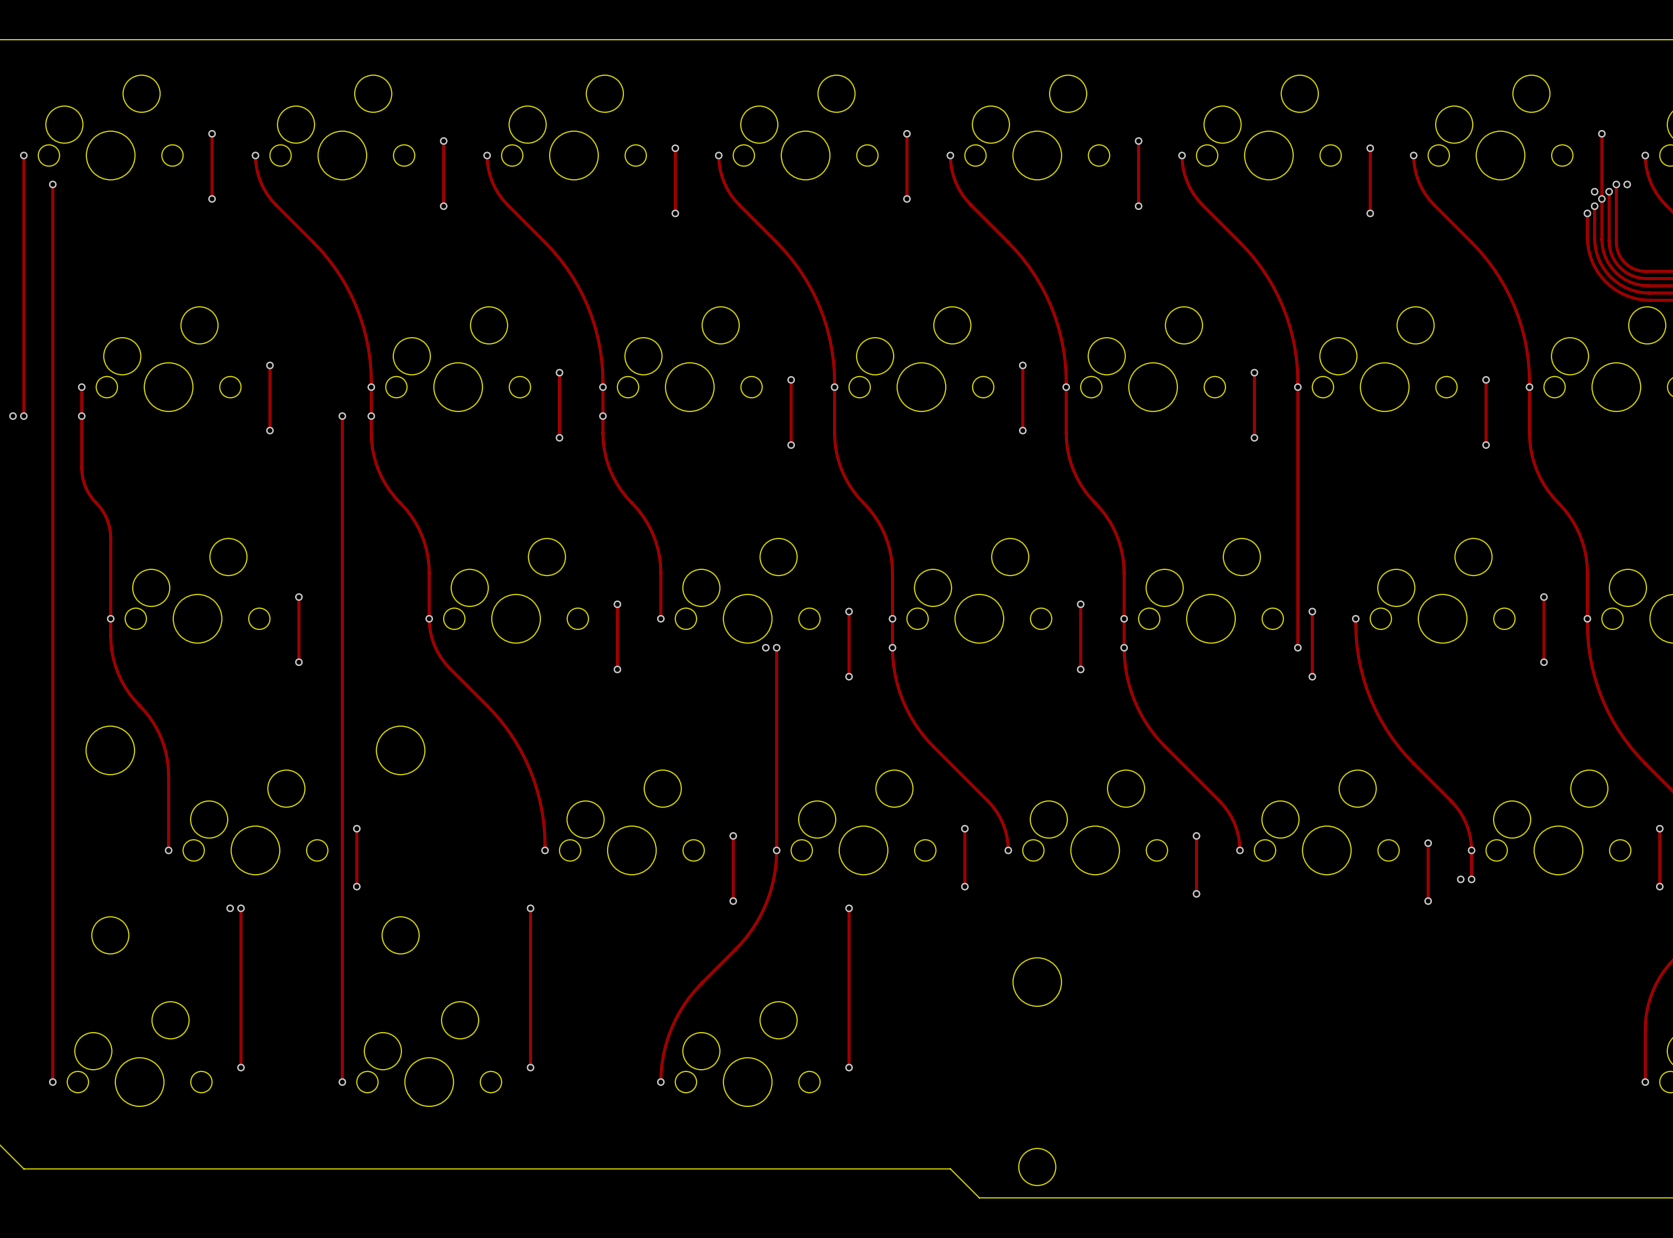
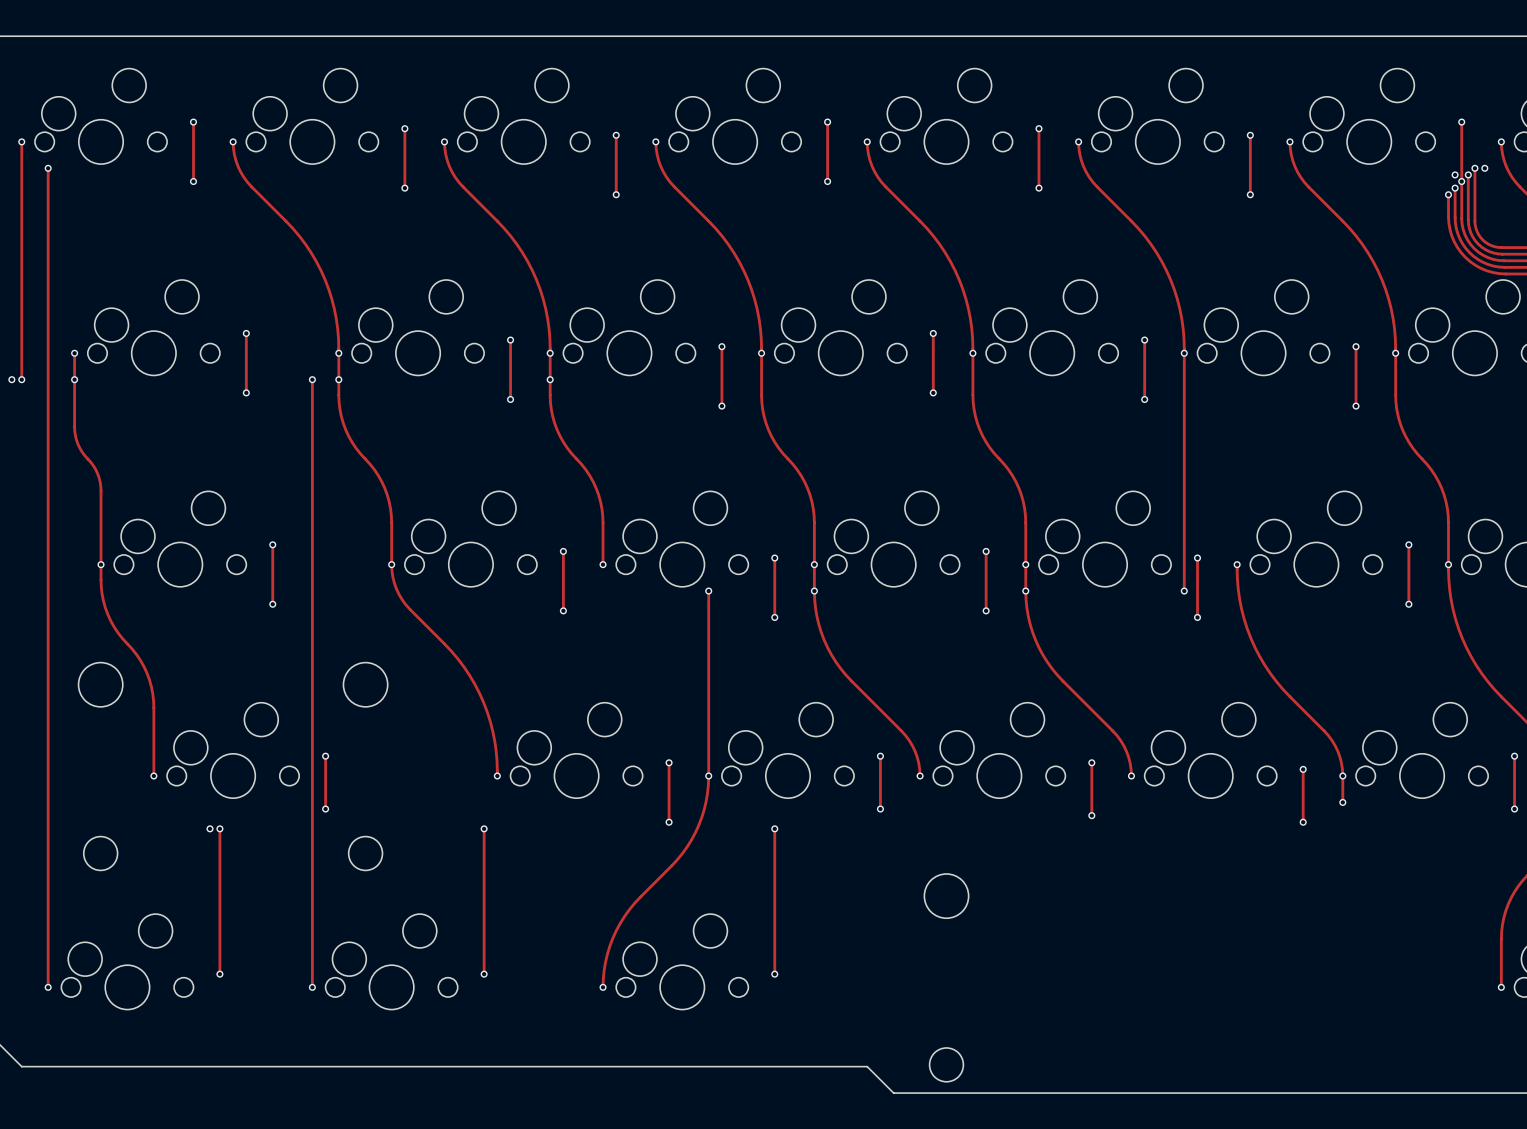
via: (765, 647) -> none
via: (1460, 879) -> none

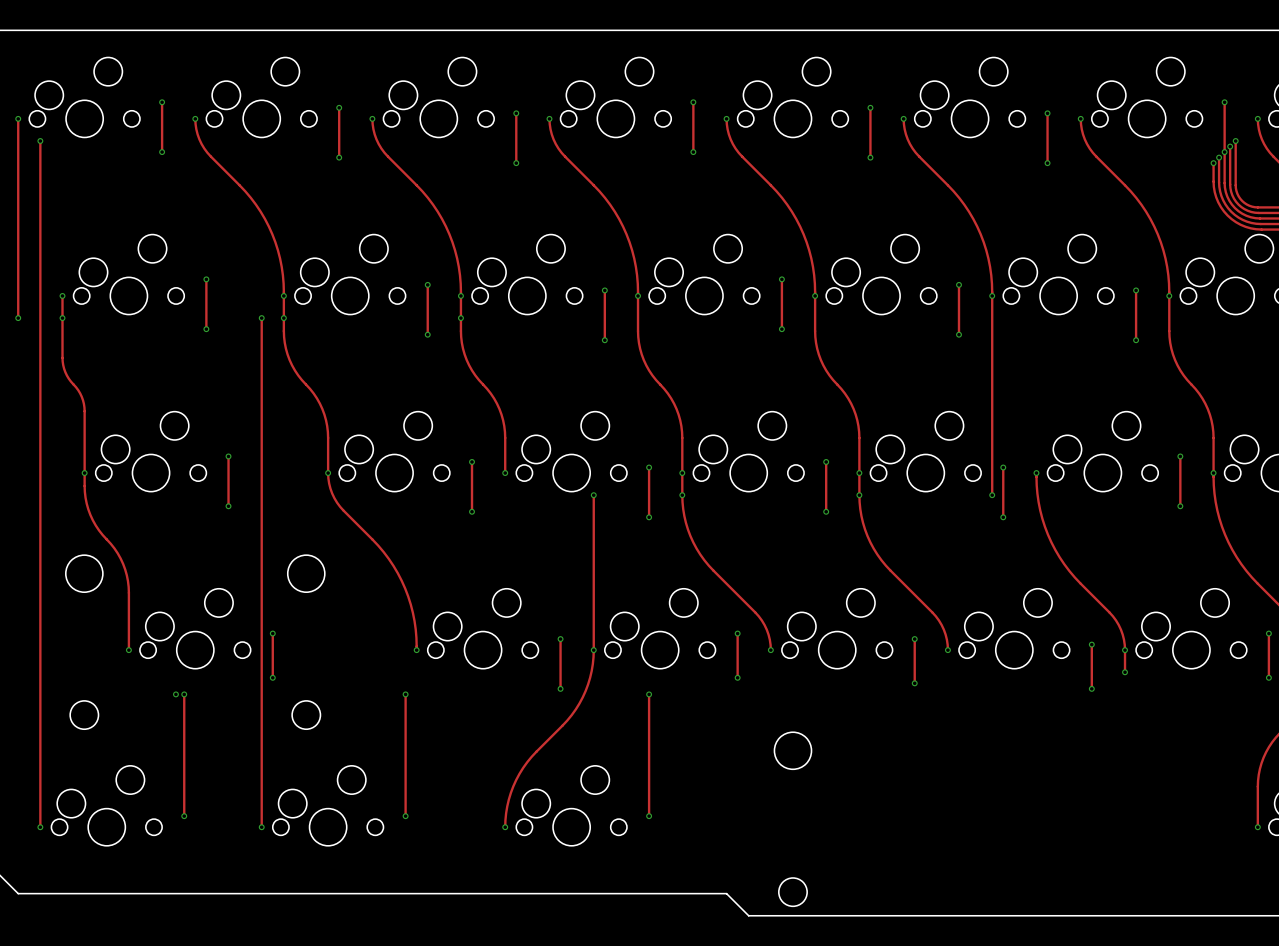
via: (1484, 168) -> none
via: (1455, 174) -> none
via: (11, 379) -> none

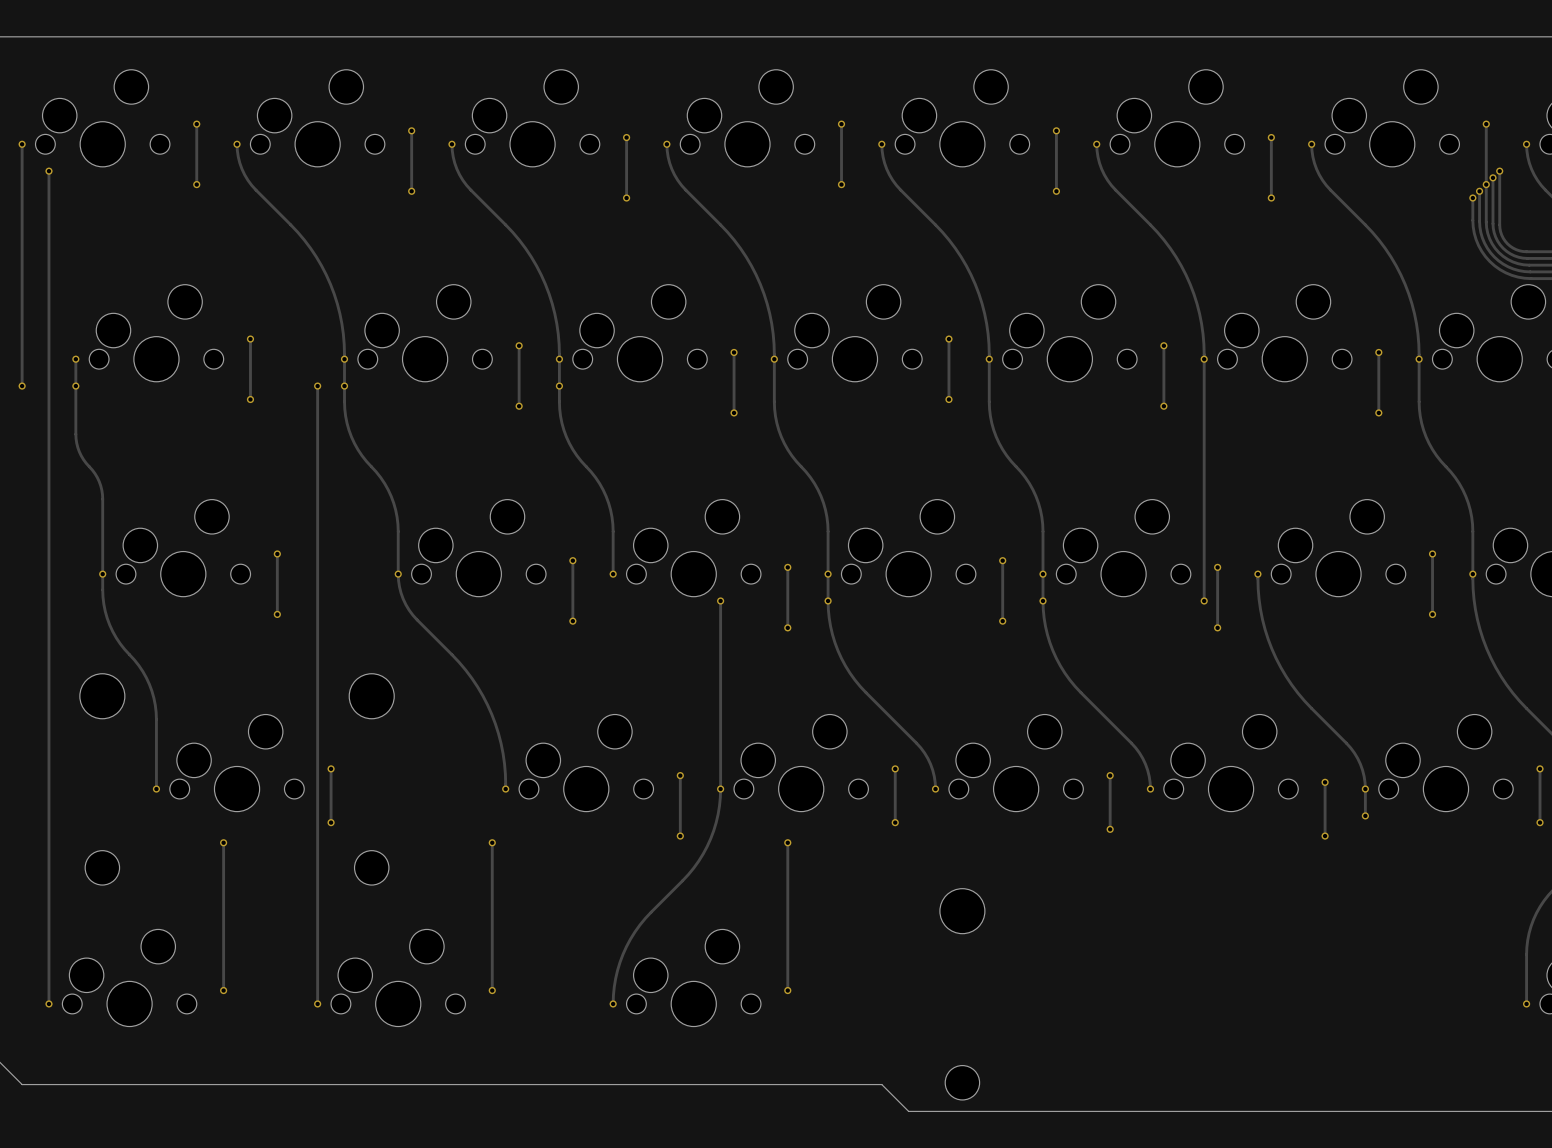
via: (175, 694) -> none

